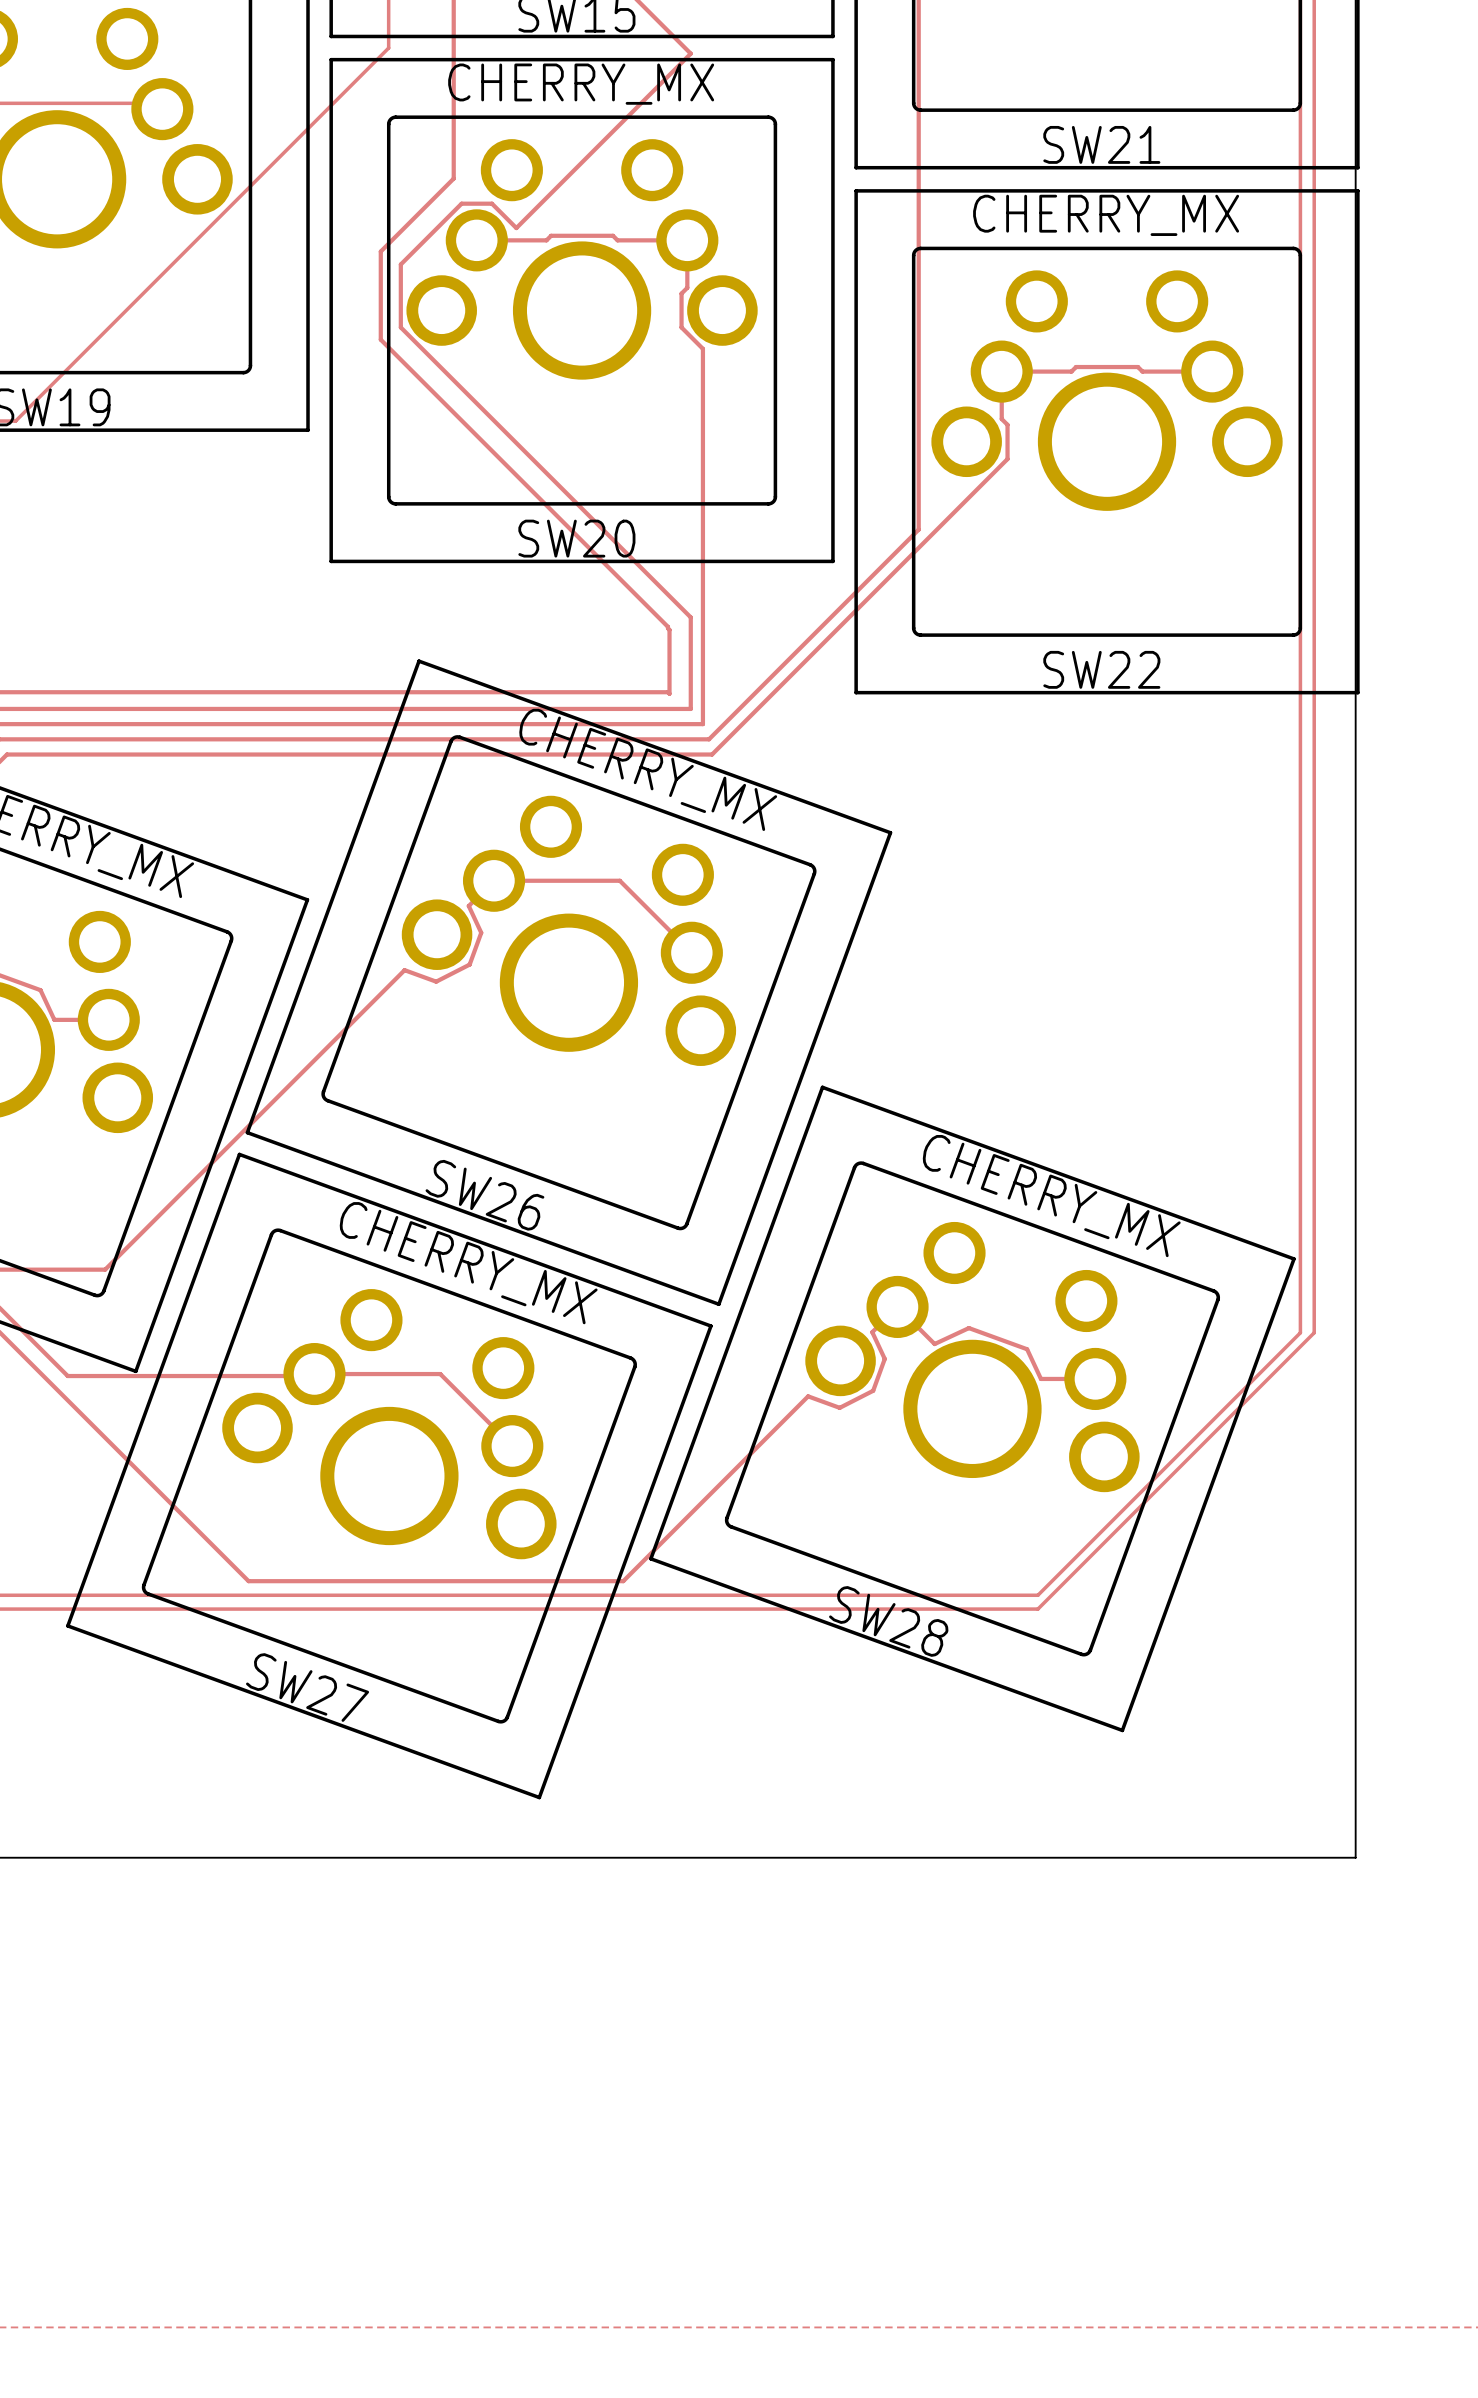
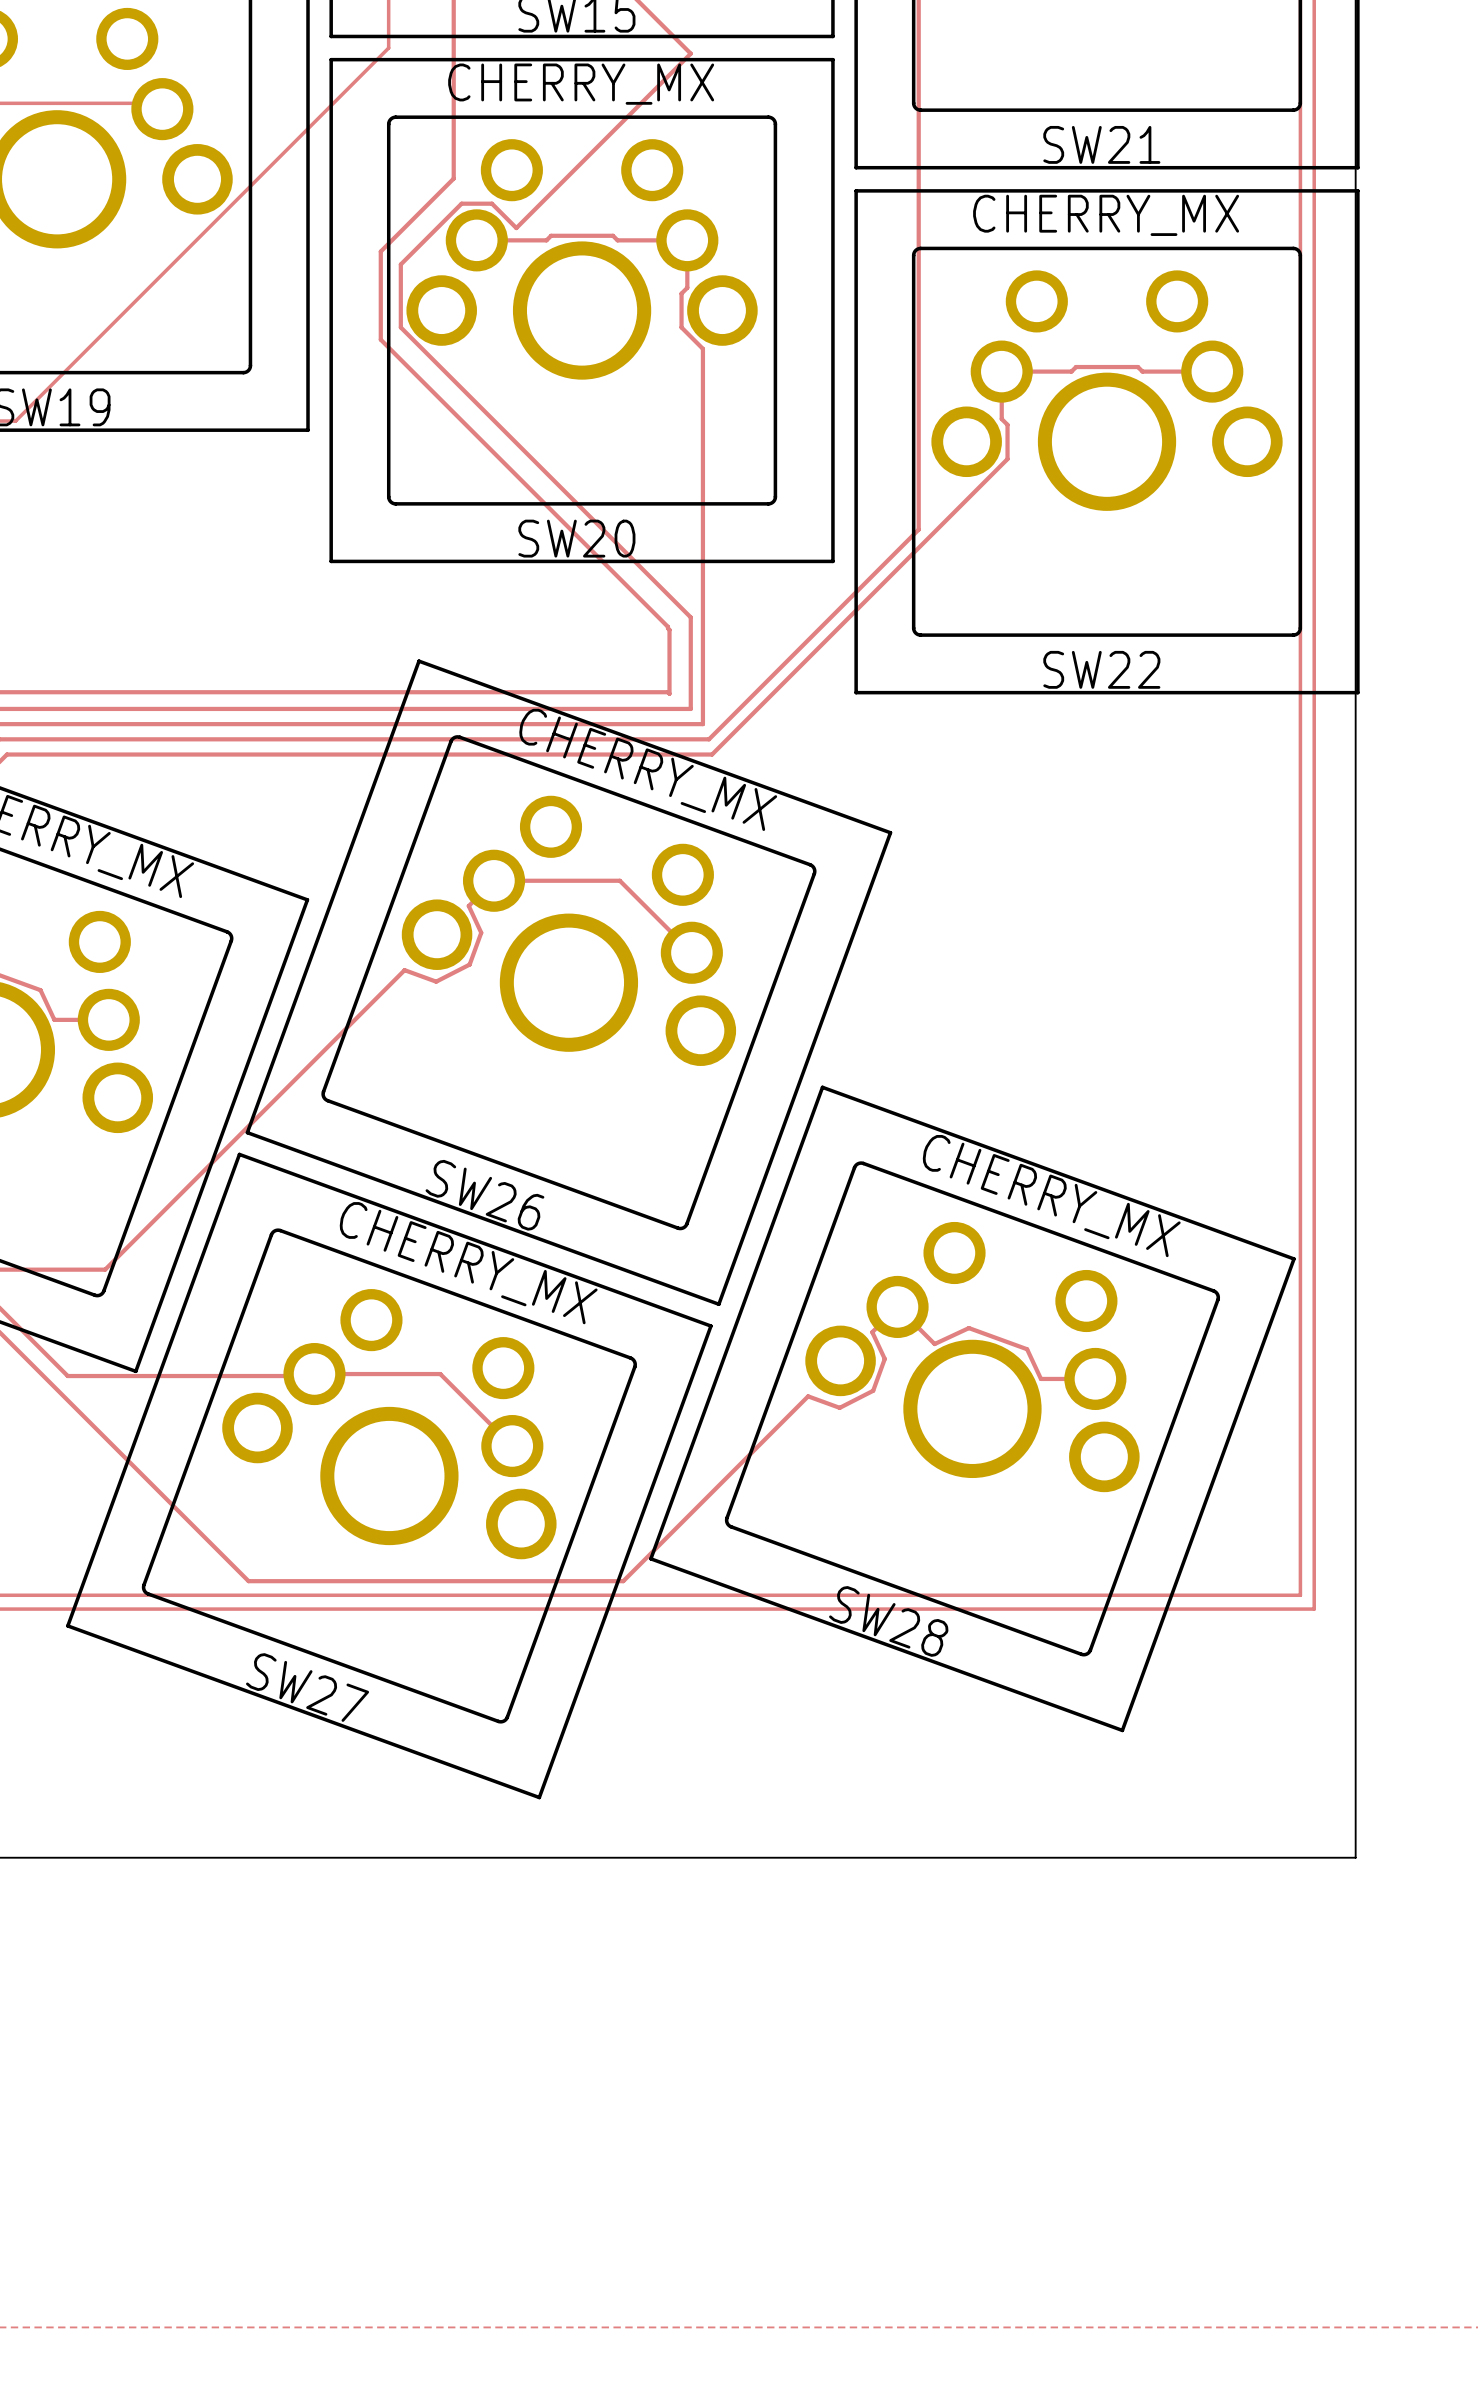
track: (1300, 1332) (1037, 1595) -> (1300, 1332) (1300, 1595) (1037, 1595)
track: (1314, 1332) (1037, 1609) -> (1314, 1332) (1314, 1609) (1037, 1609)

